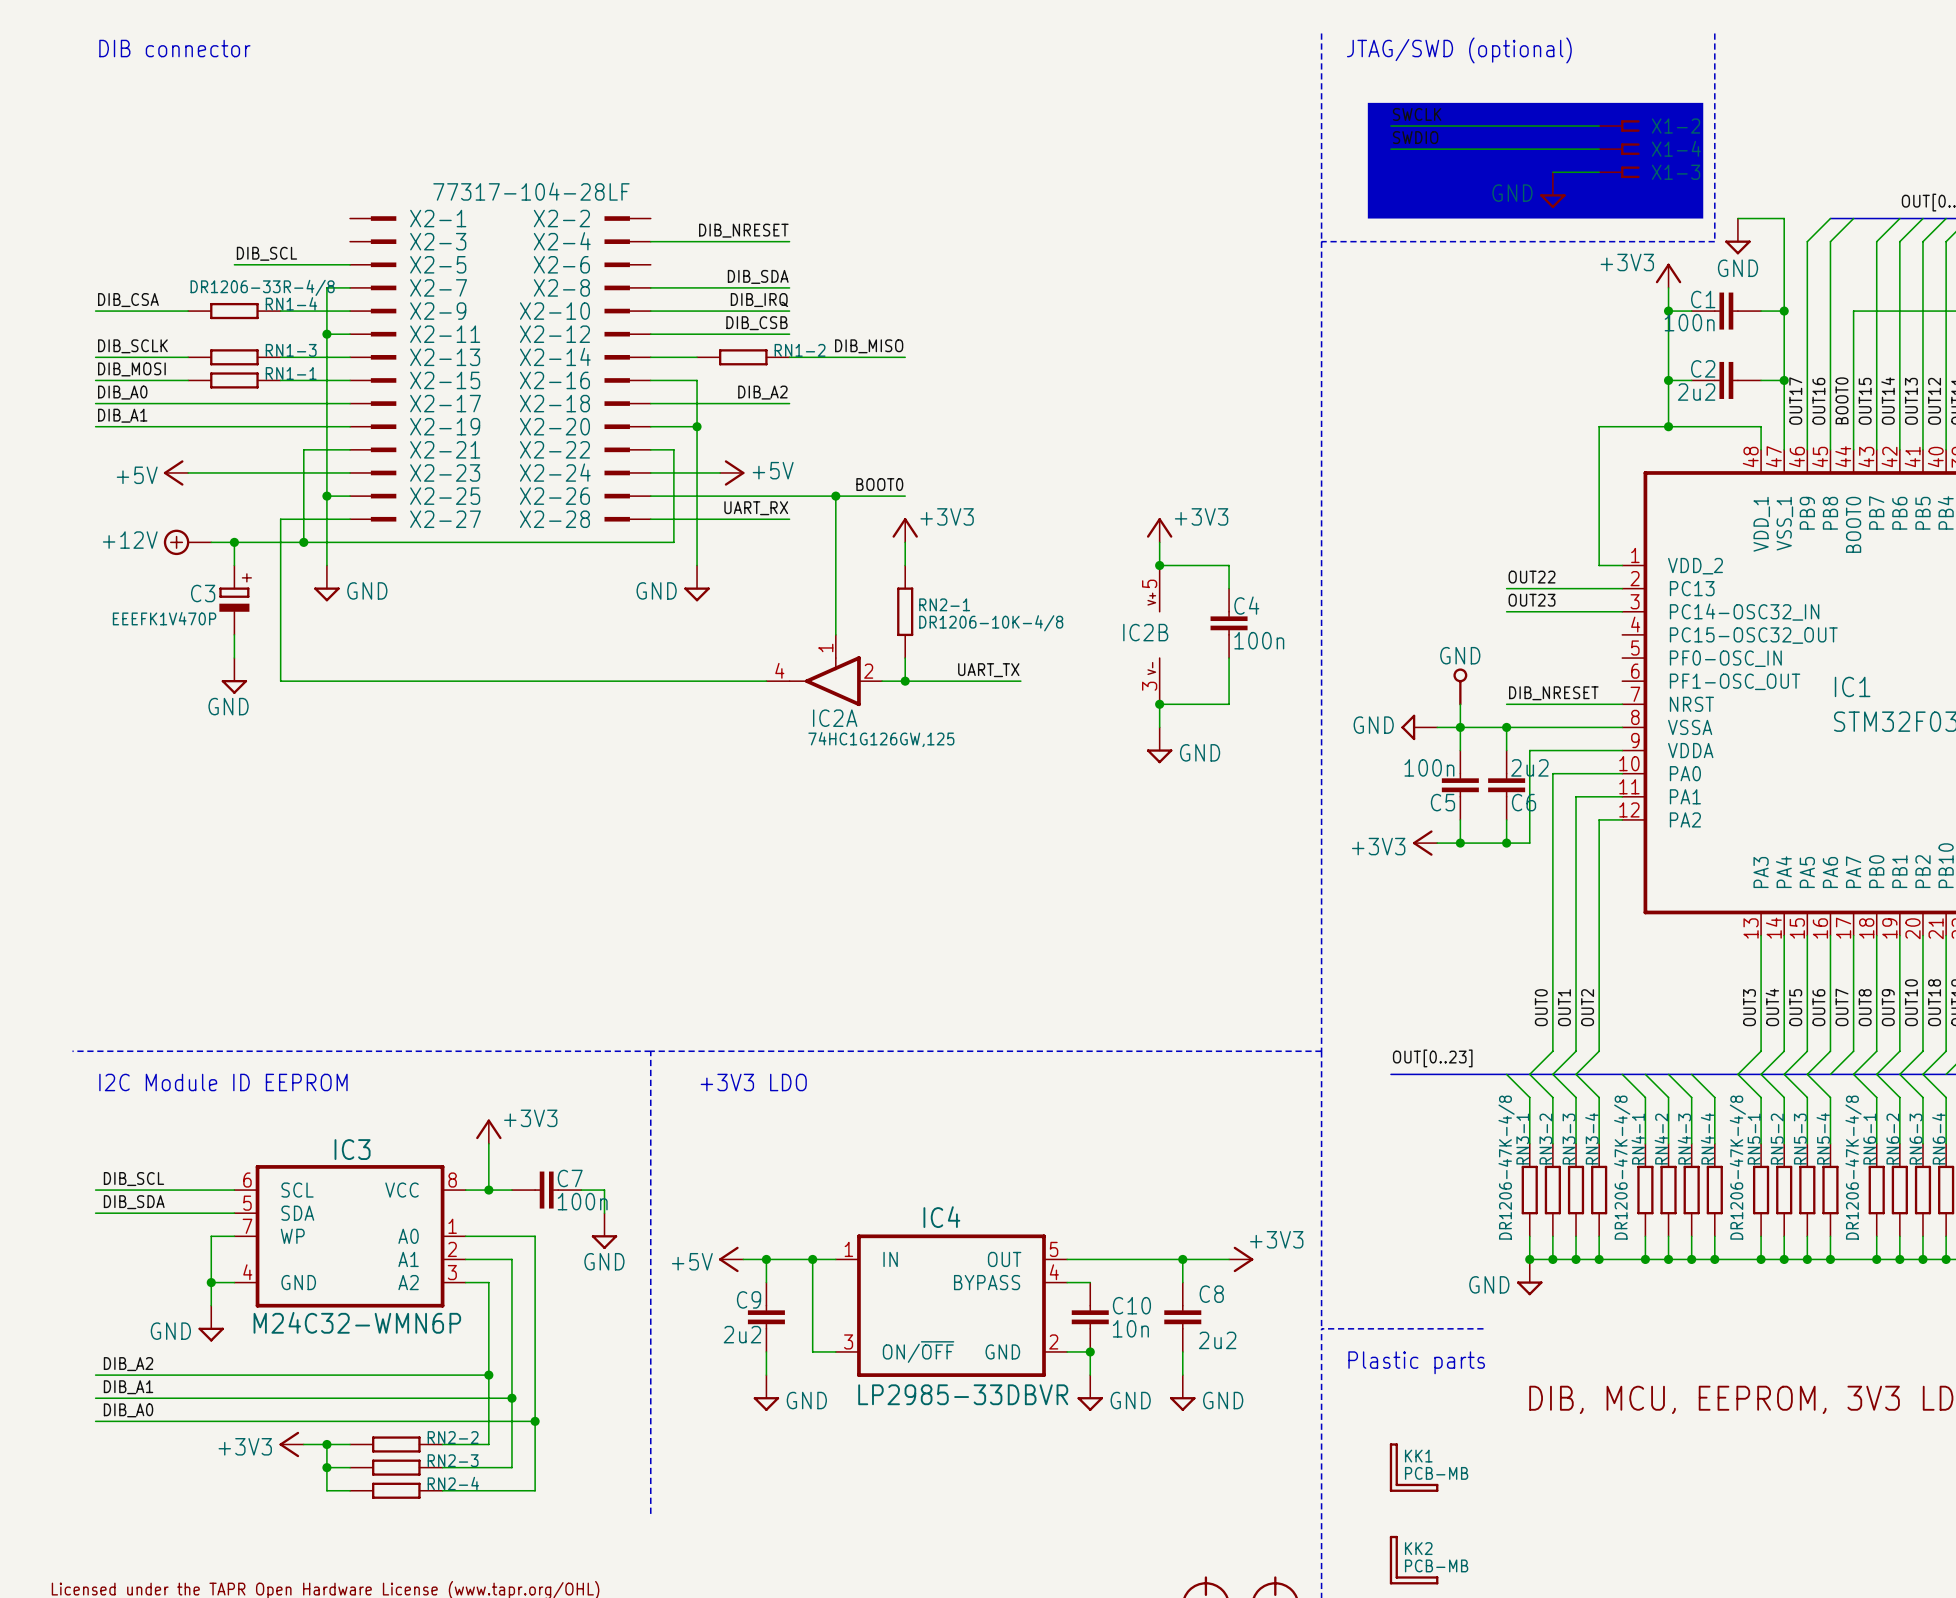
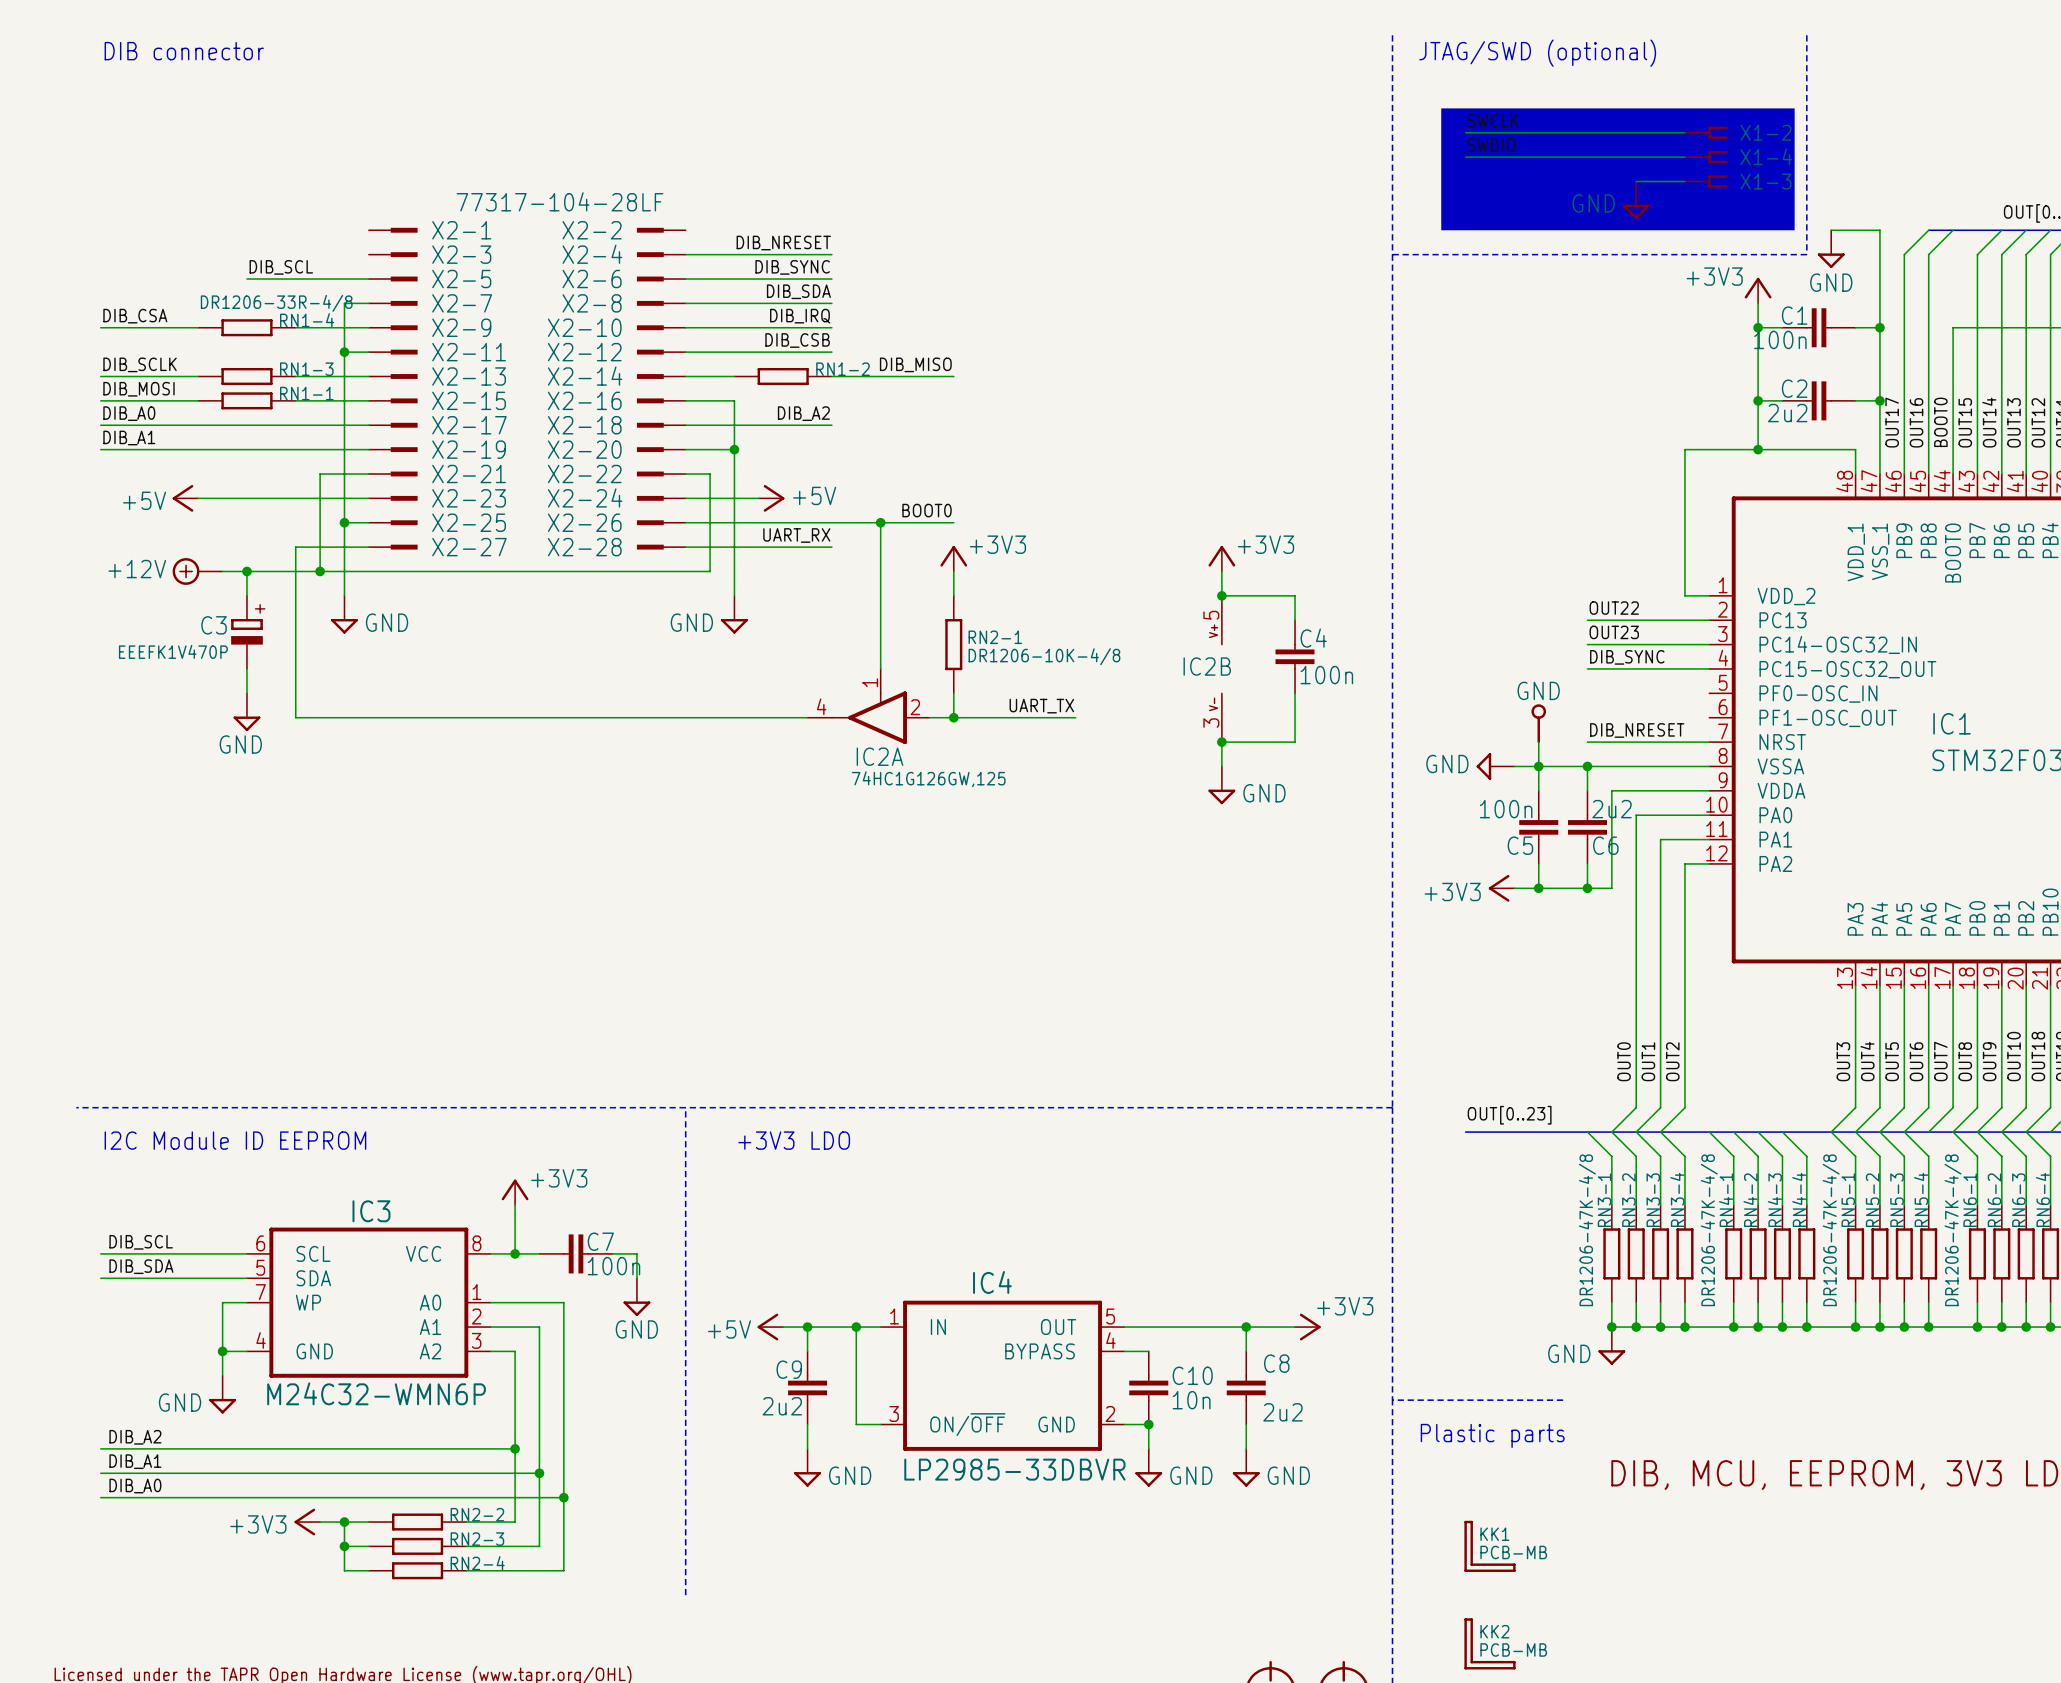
label: none -> DIB_SYNC (792, 267)
wire: none -> (685, 279) (831, 279)
label: none -> DIB_SYNC (1627, 657)
wire: none -> (1587, 668) (1709, 668)

